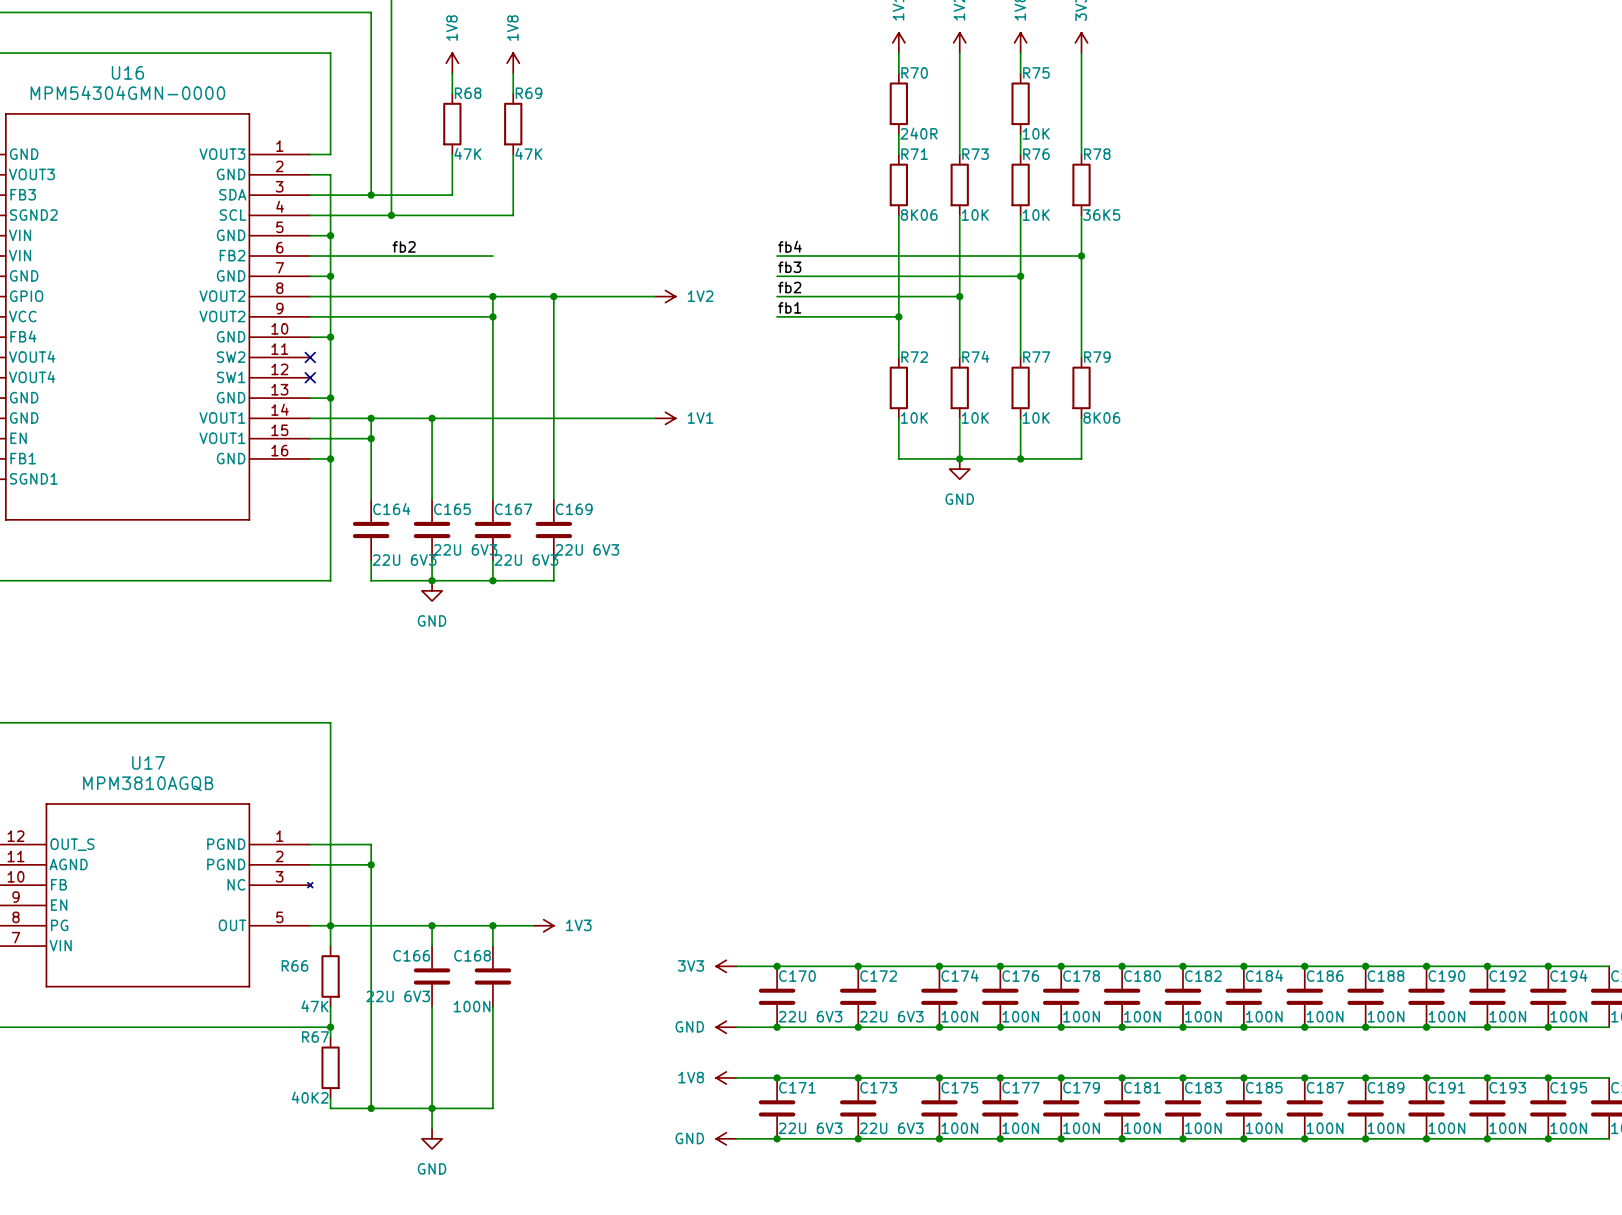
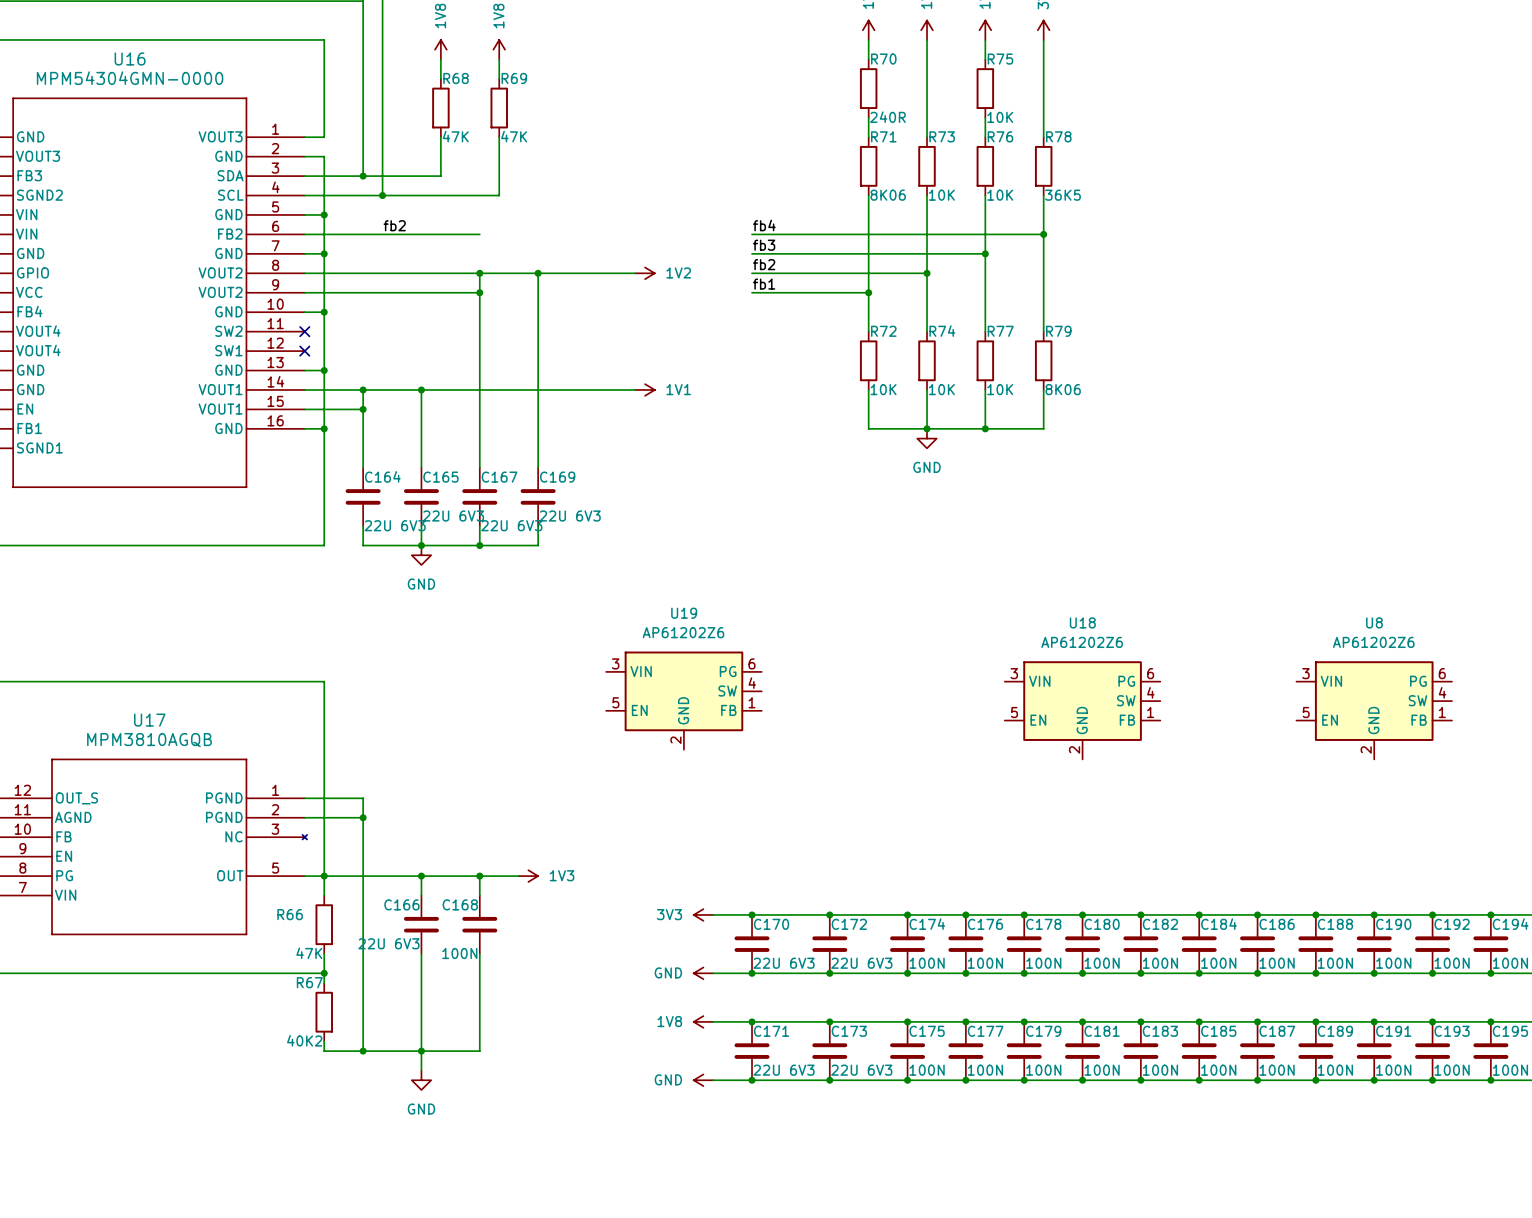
U19: none -> AP61202Z6 (683, 700)
U18: none -> AP61202Z6 (1082, 710)
U8: none -> AP61202Z6 (1374, 710)

